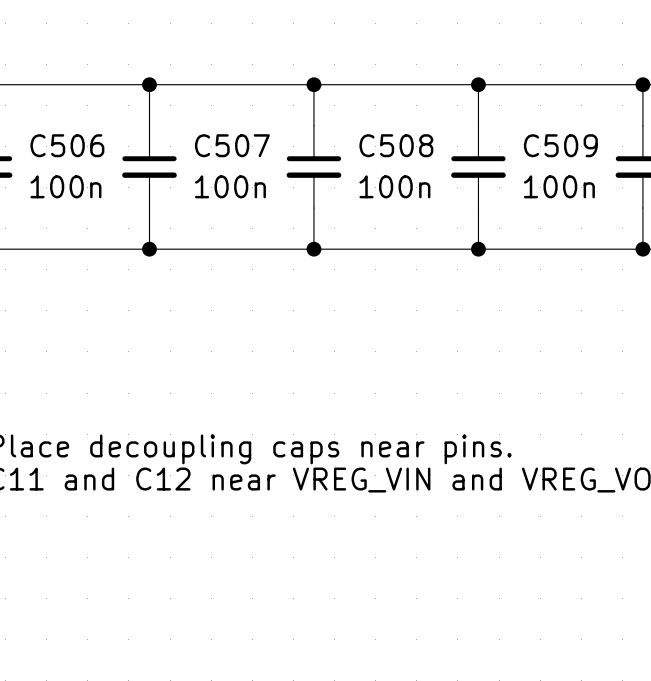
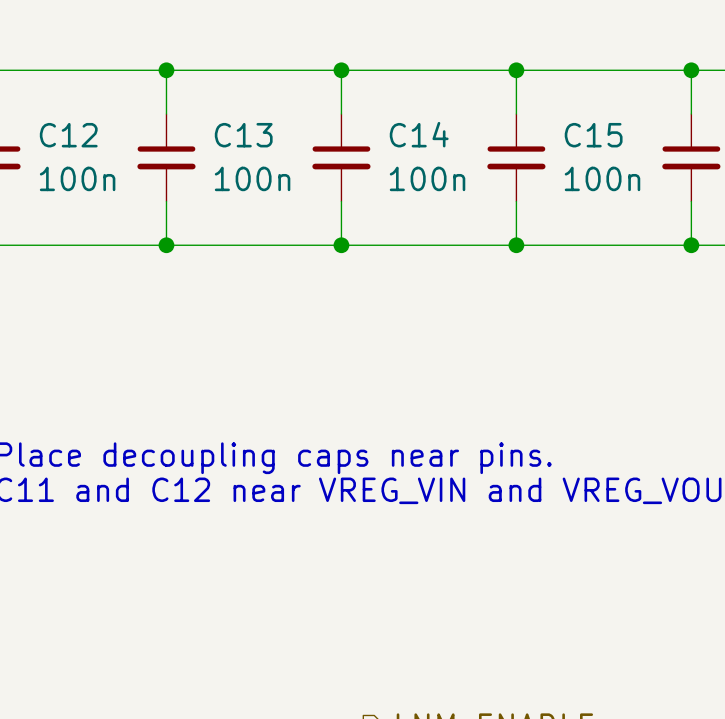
C506 name: C506 (67, 145) -> C12 (68, 135)
C507 name: C507 (232, 145) -> C13 (243, 135)
C508 name: C508 (396, 145) -> C14 (419, 134)
C509 name: C509 (560, 145) -> C15 (593, 135)

